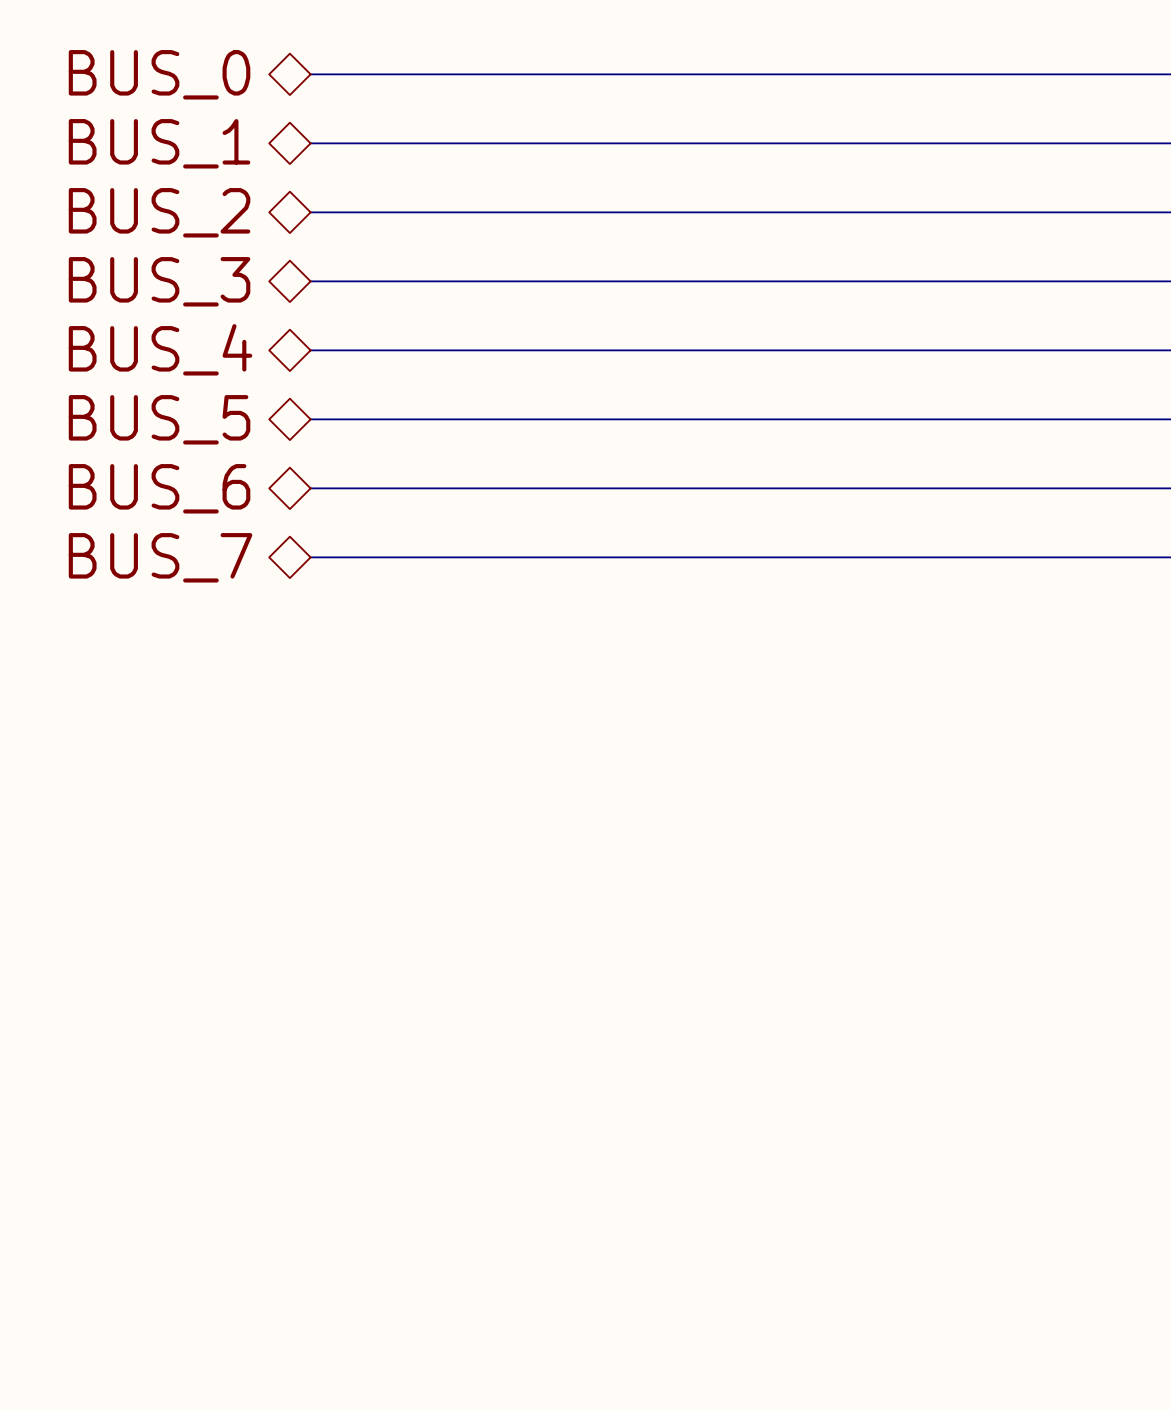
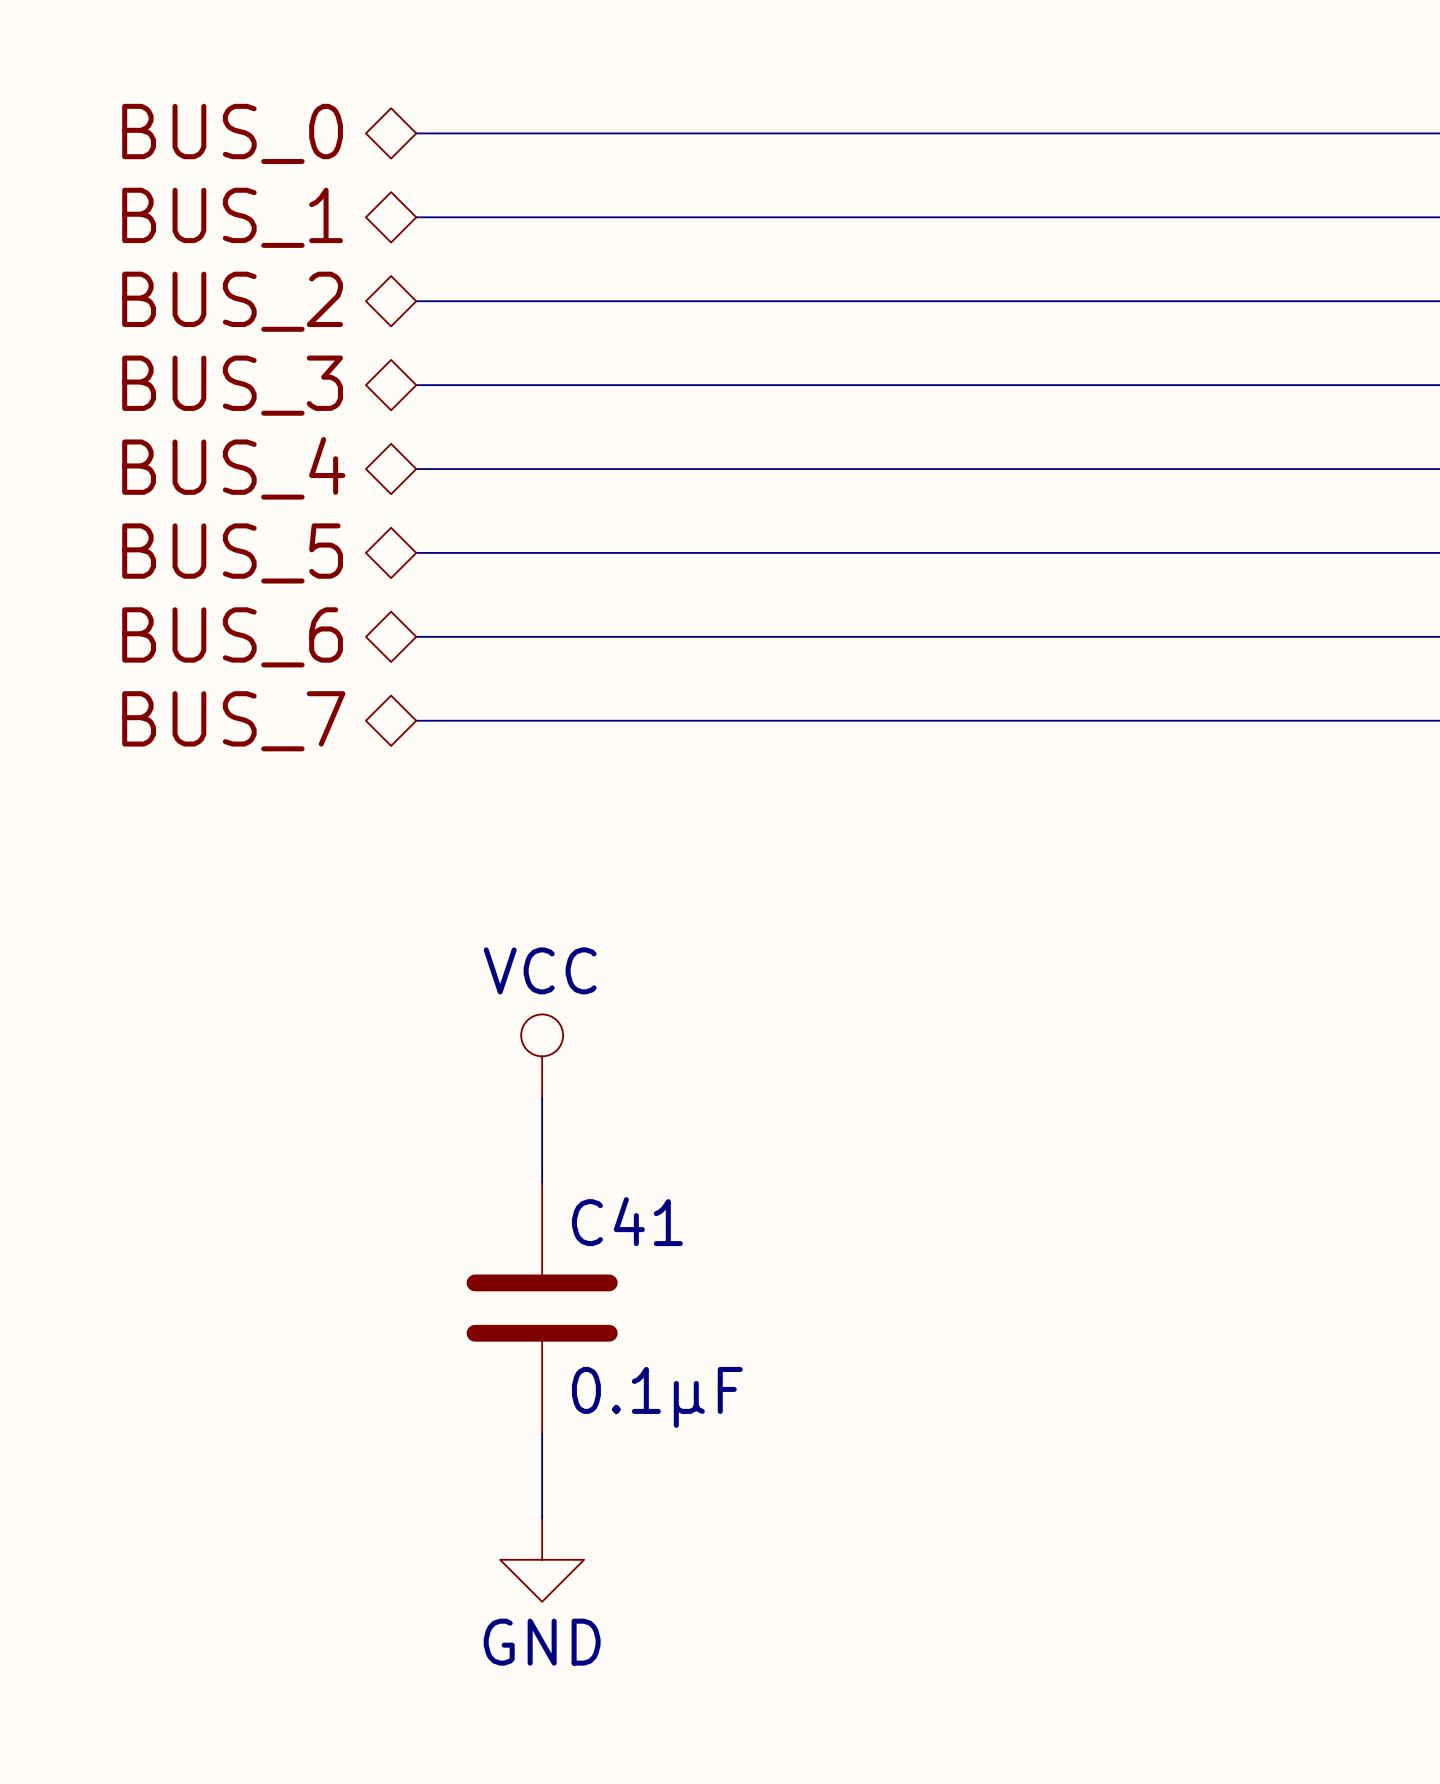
power symbol: none -> VCC (542, 1056)
wire: none -> (542, 1098) (542, 1182)
C41: none -> 0.1µF (542, 1308)
wire: none -> (542, 1433) (542, 1517)
power symbol: none -> GND (542, 1559)

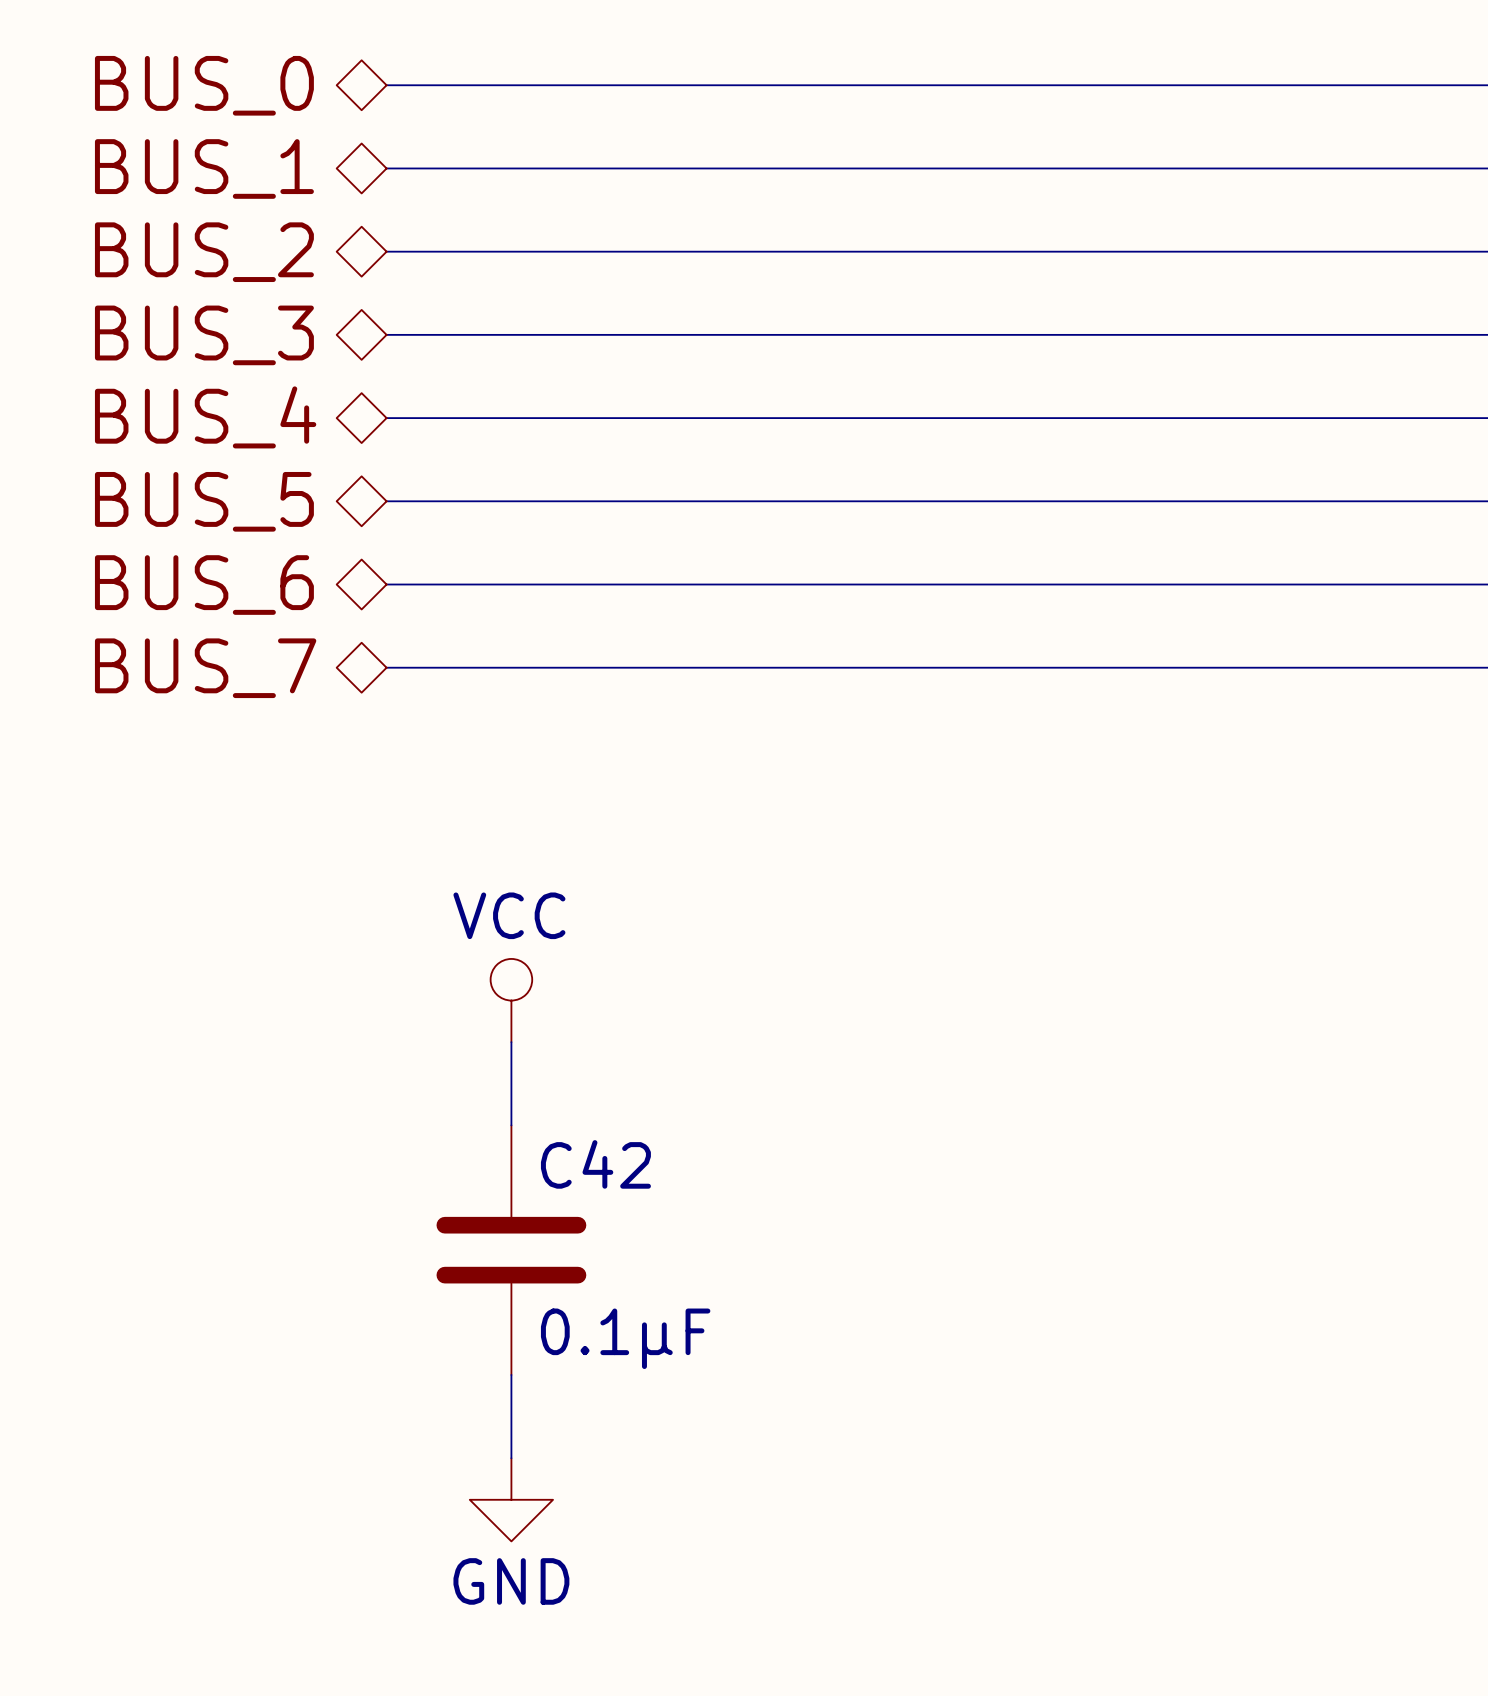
C41 name: C41 (627, 1221) -> C42 (595, 1164)

